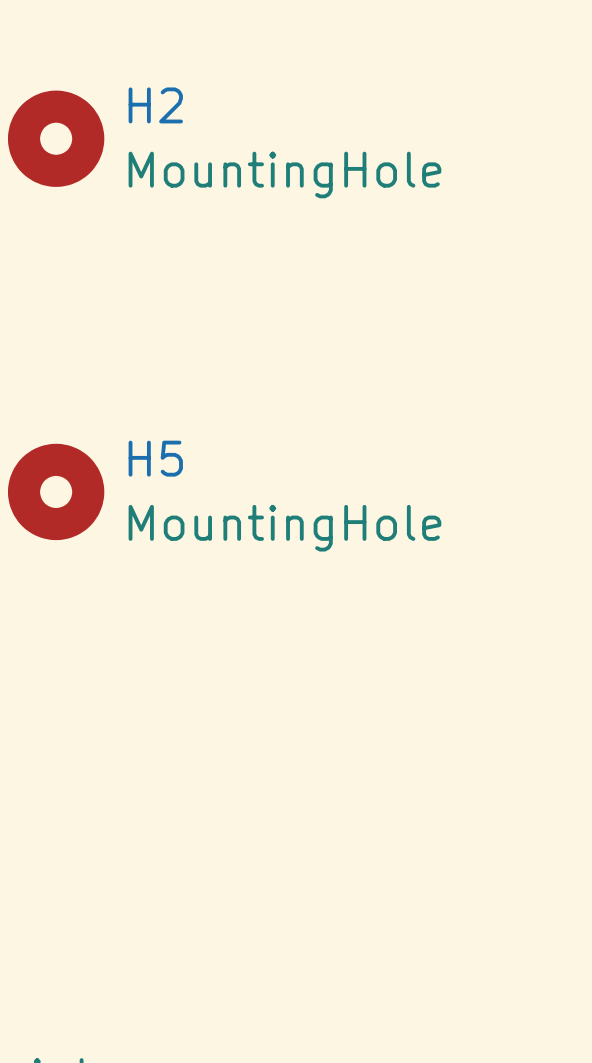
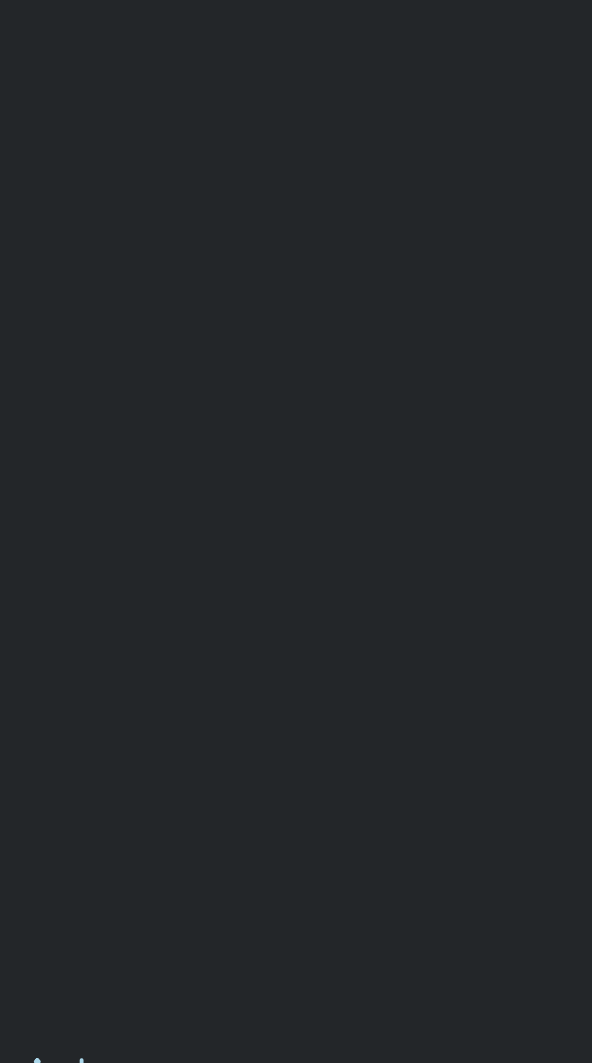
H2: MountingHole (56, 138) -> none
H5: MountingHole (56, 491) -> none

